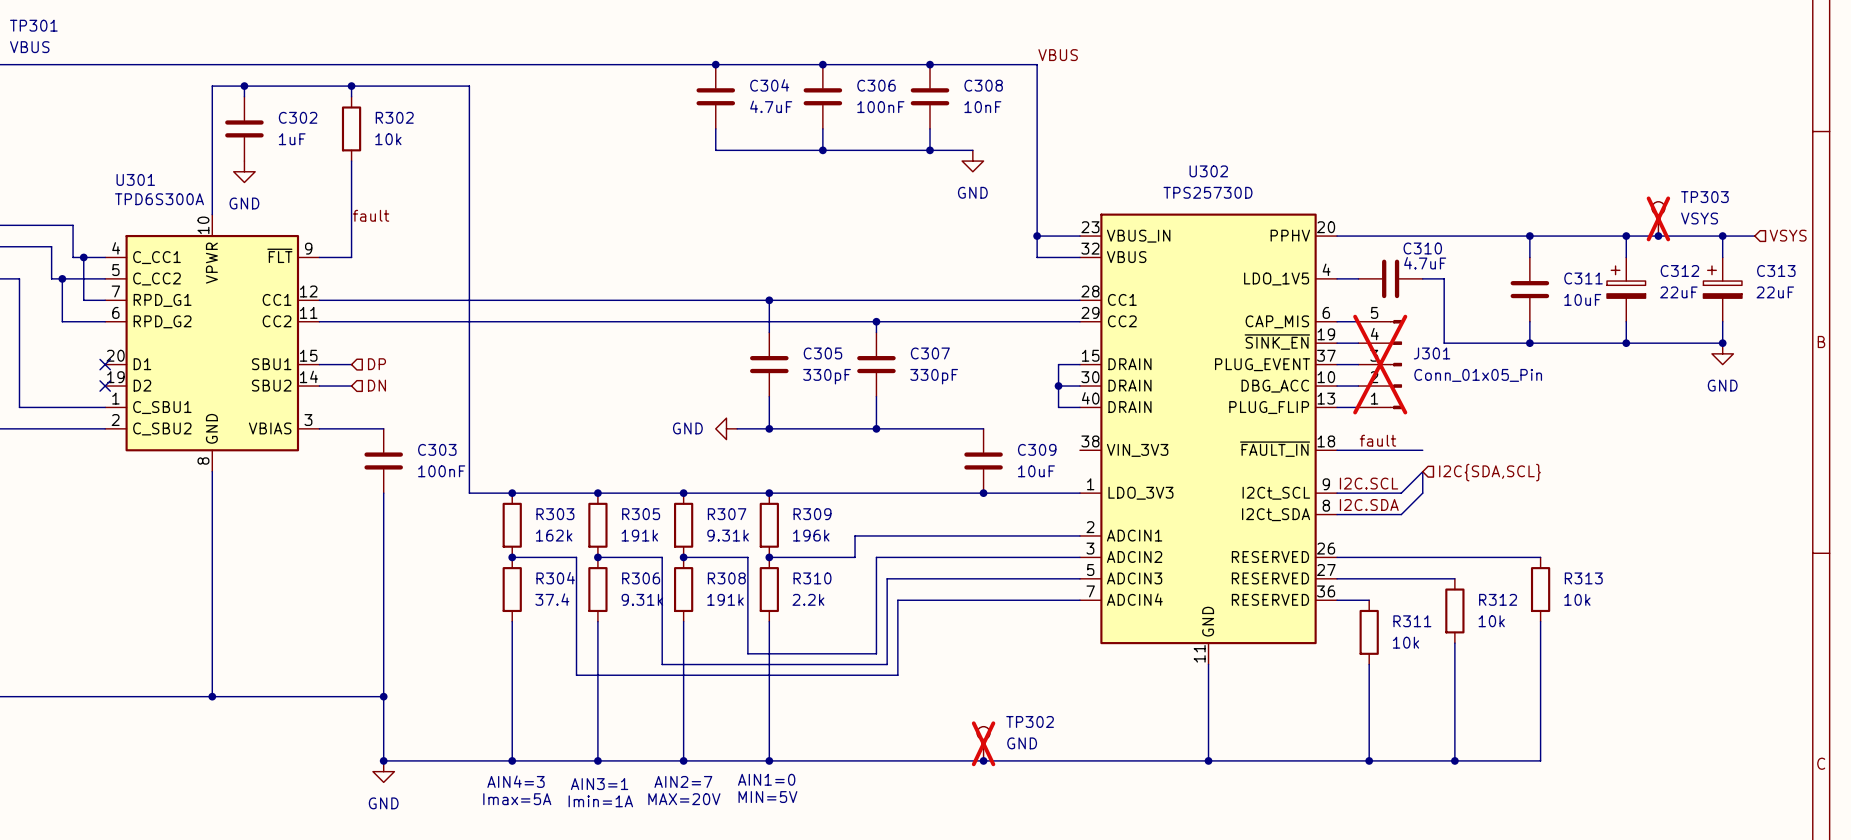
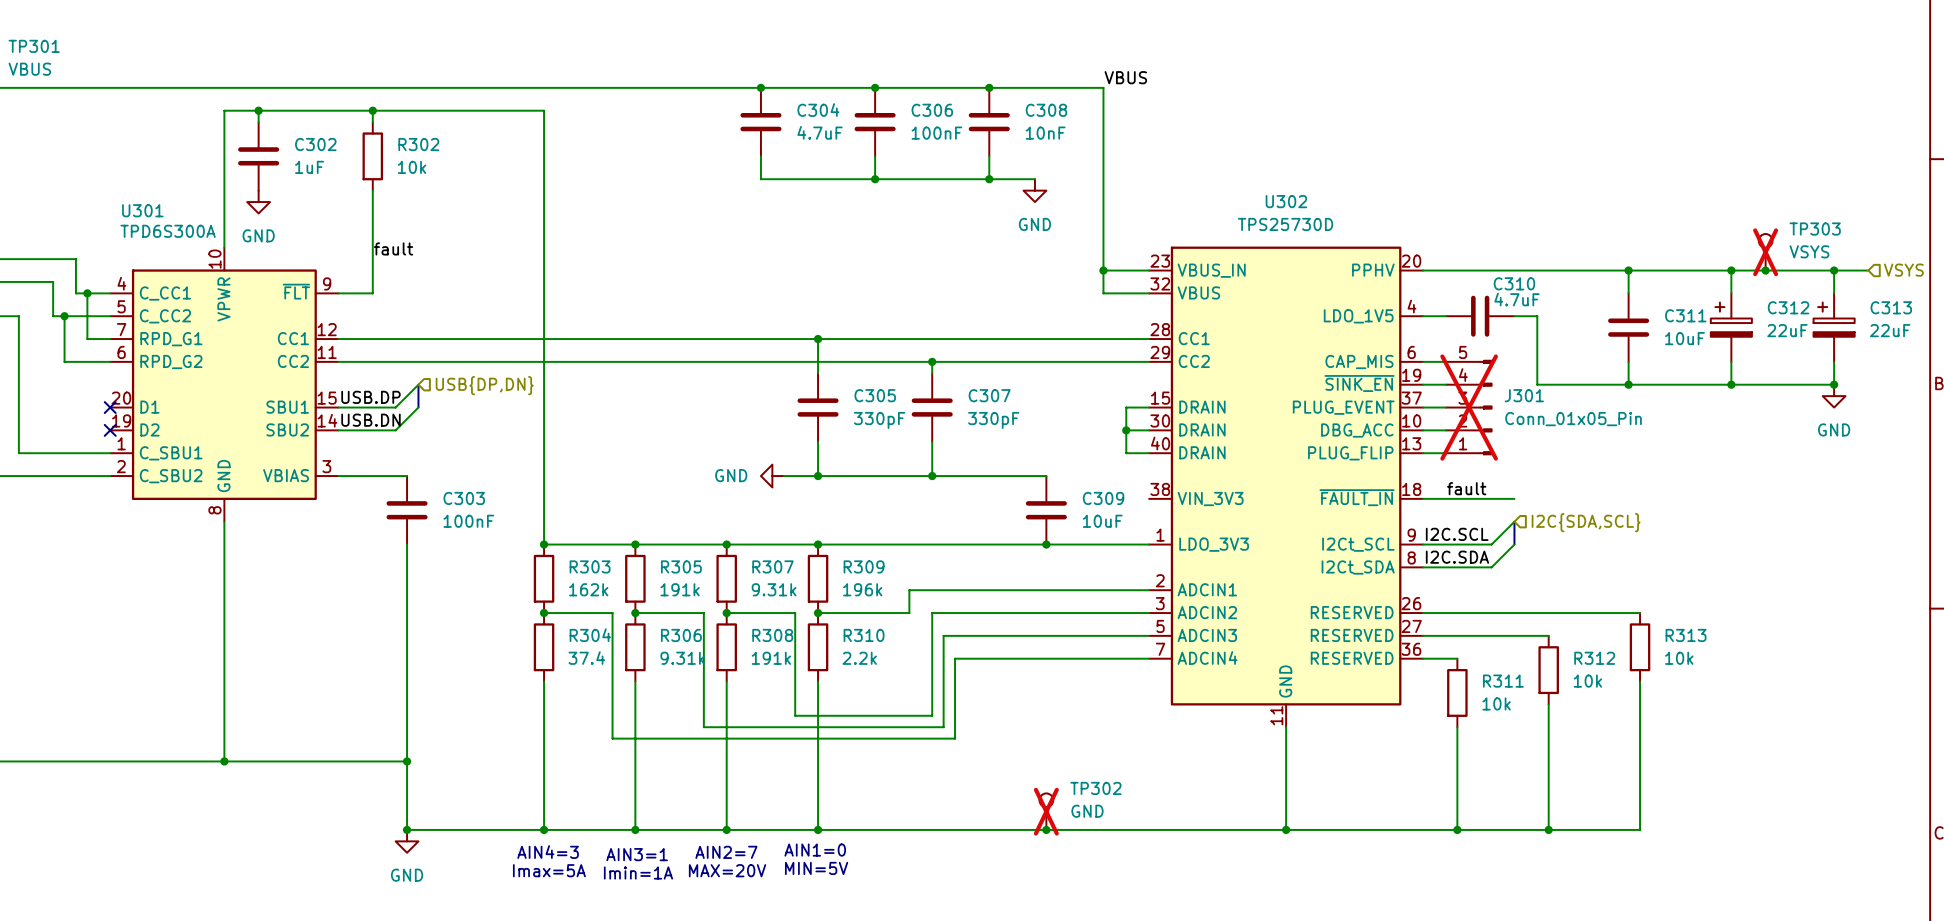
wire: (469, 86) (469, 493) (512, 493) -> (498, 110) (544, 110) (544, 544)
wire: none -> (418, 384) (395, 407) (372, 407)
bus: none -> (418, 384) (418, 407)
hierarchical label: none -> USB{DP,DN} (484, 385)
label: none -> USB.DP (370, 397)
hierarchical label: DP (376, 364) -> none
wire: none -> (418, 407) (395, 430) (372, 430)
label: none -> USB.DN (370, 420)
hierarchical label: DN (376, 385) -> none

